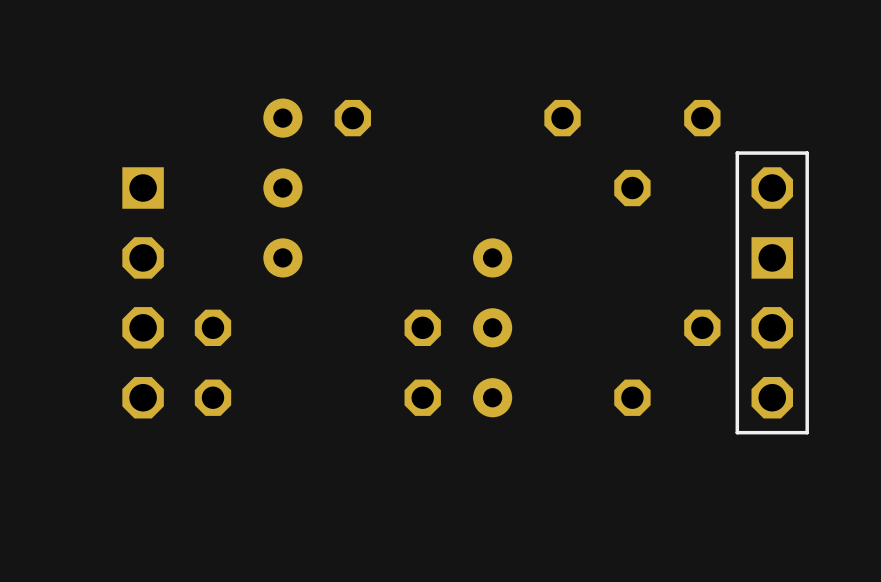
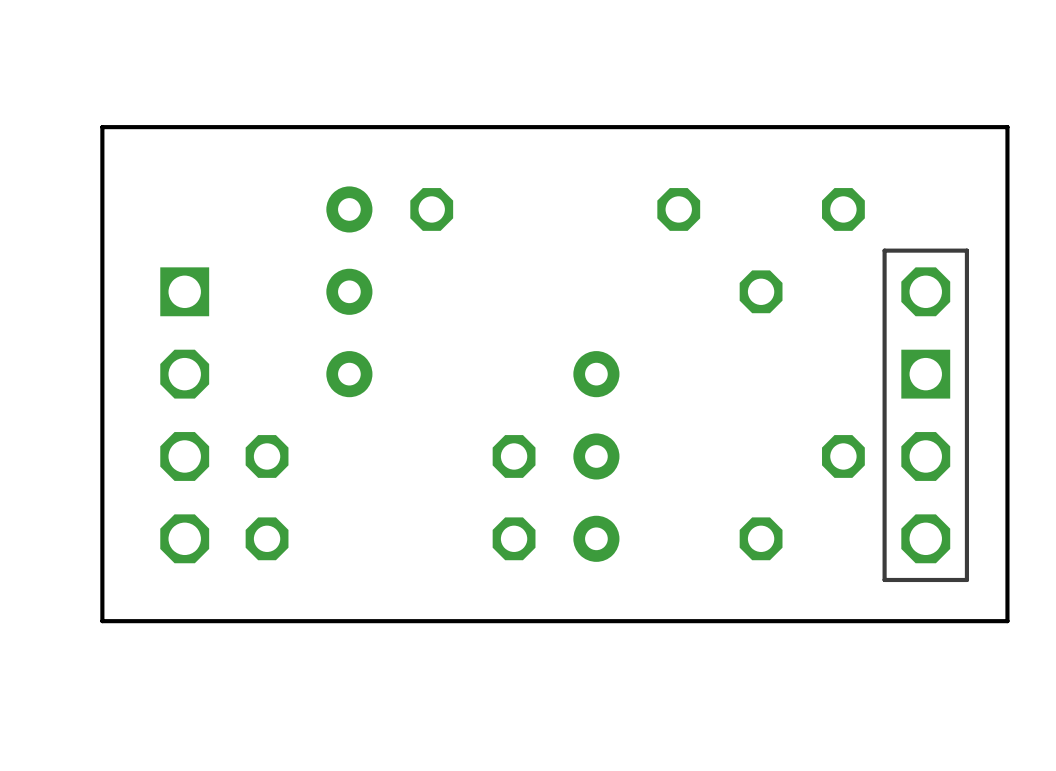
board edge: none -> (1007, 127) (102, 127) (102, 621) (1007, 621) (1007, 127)

